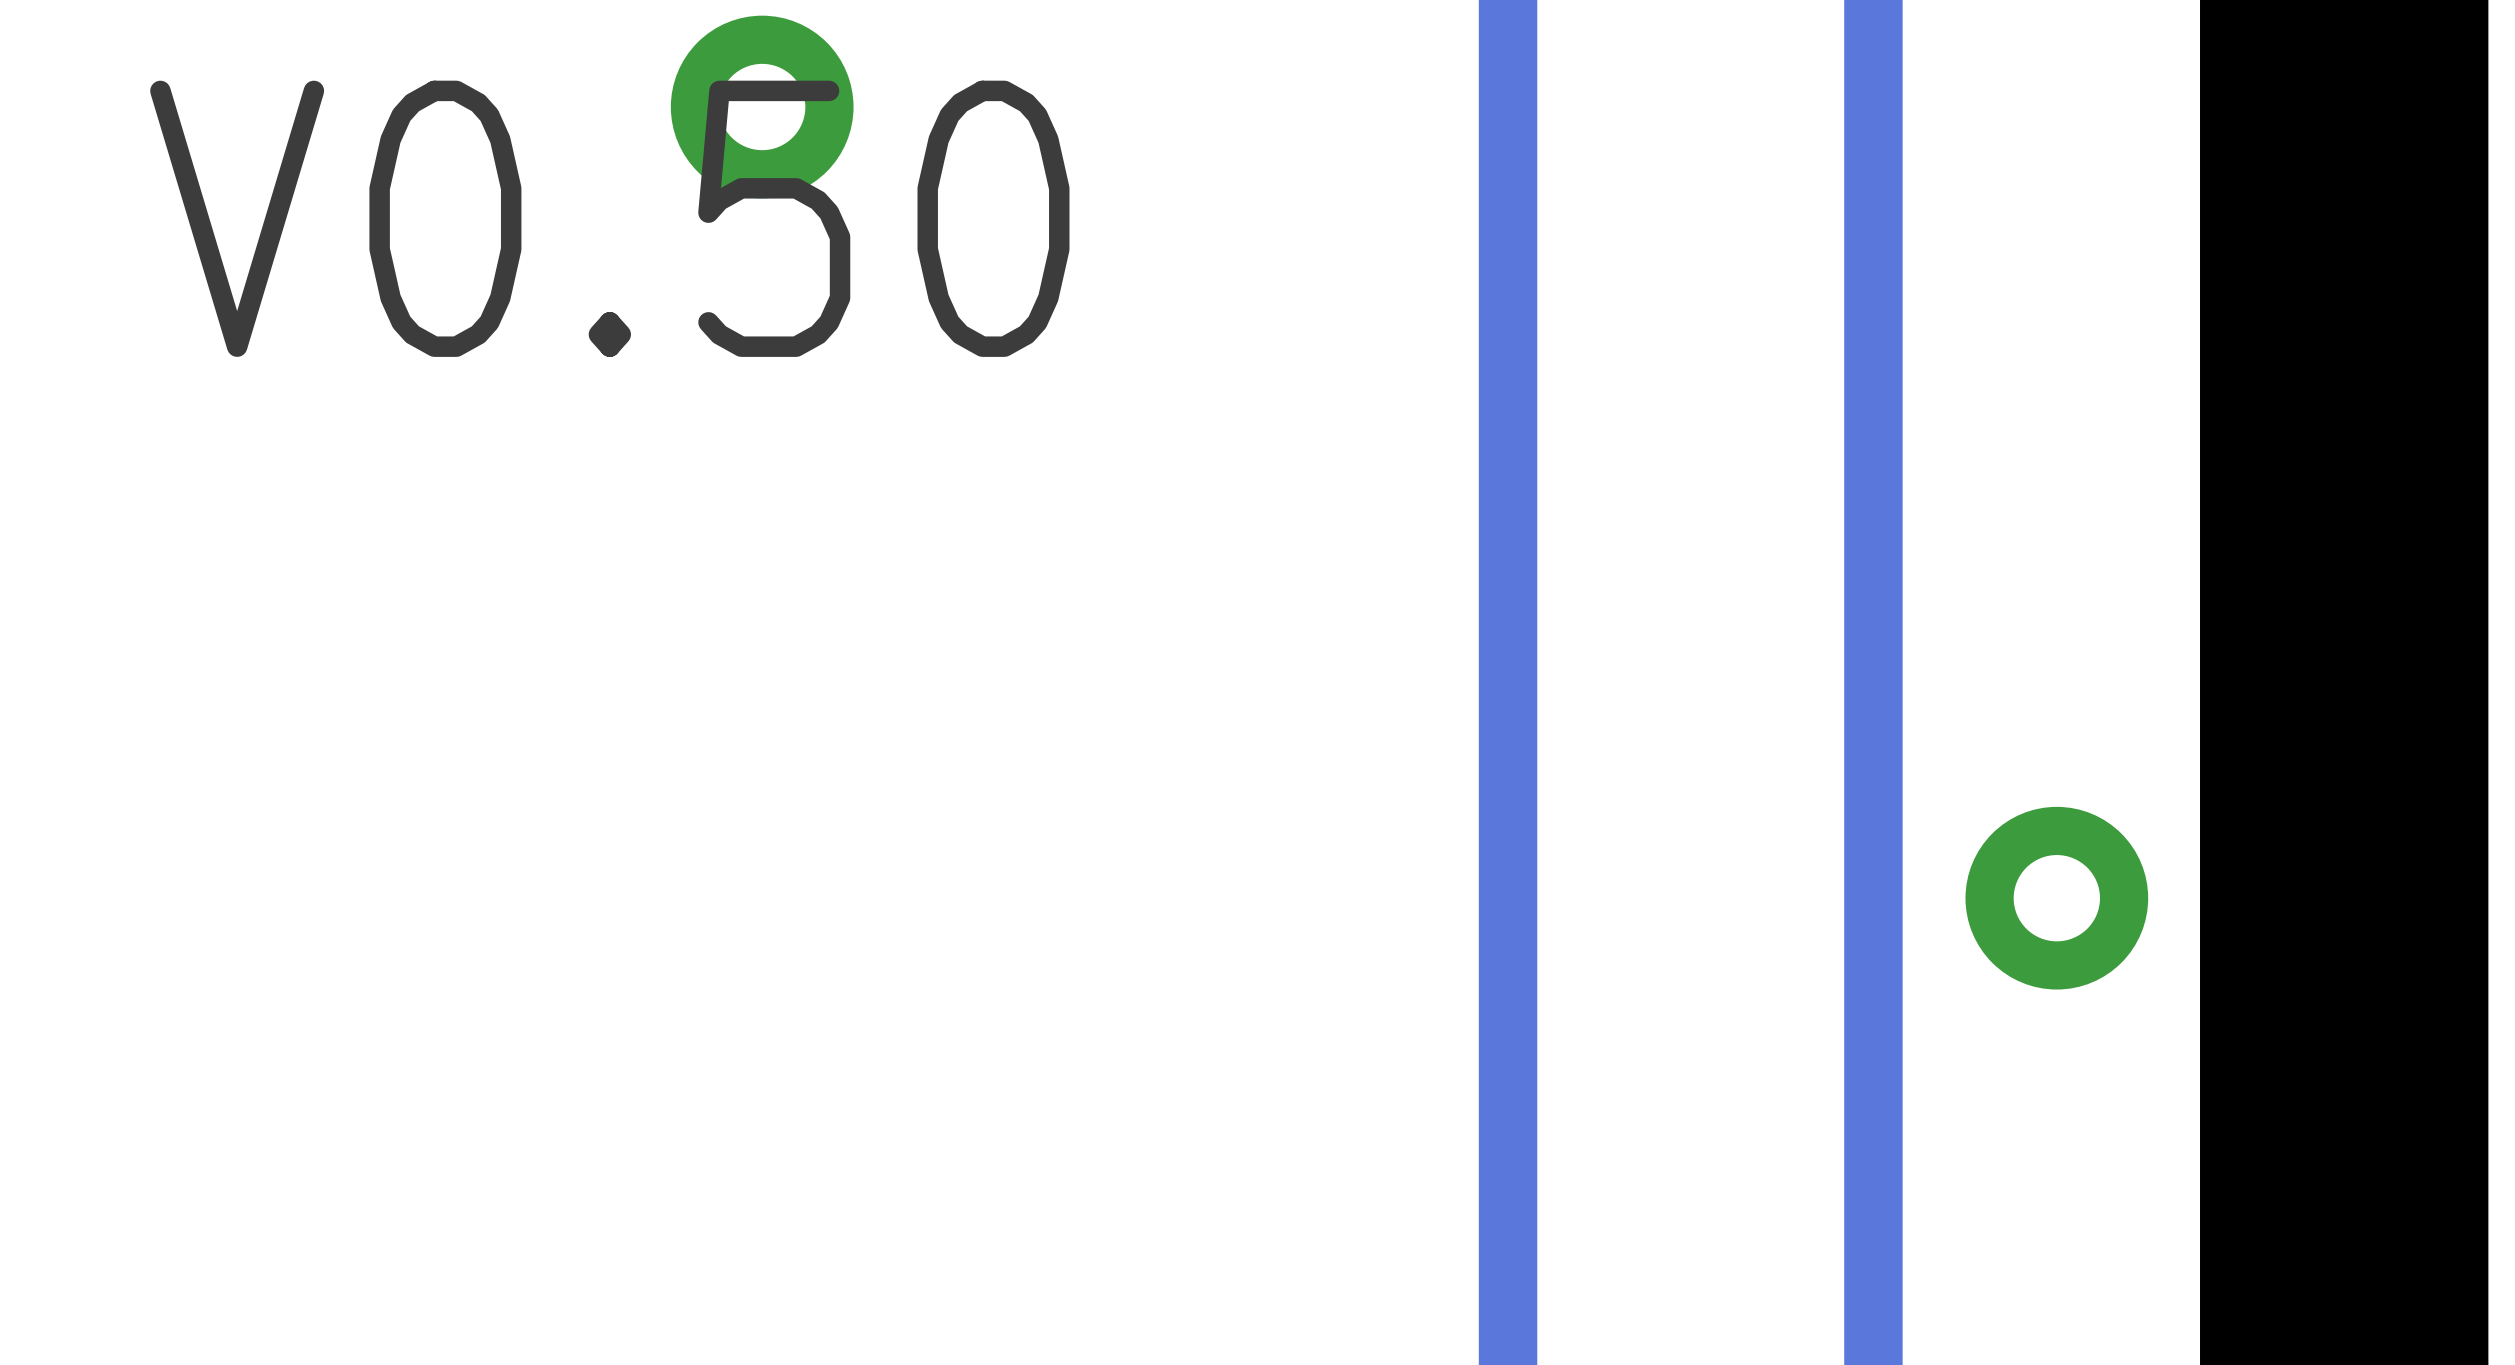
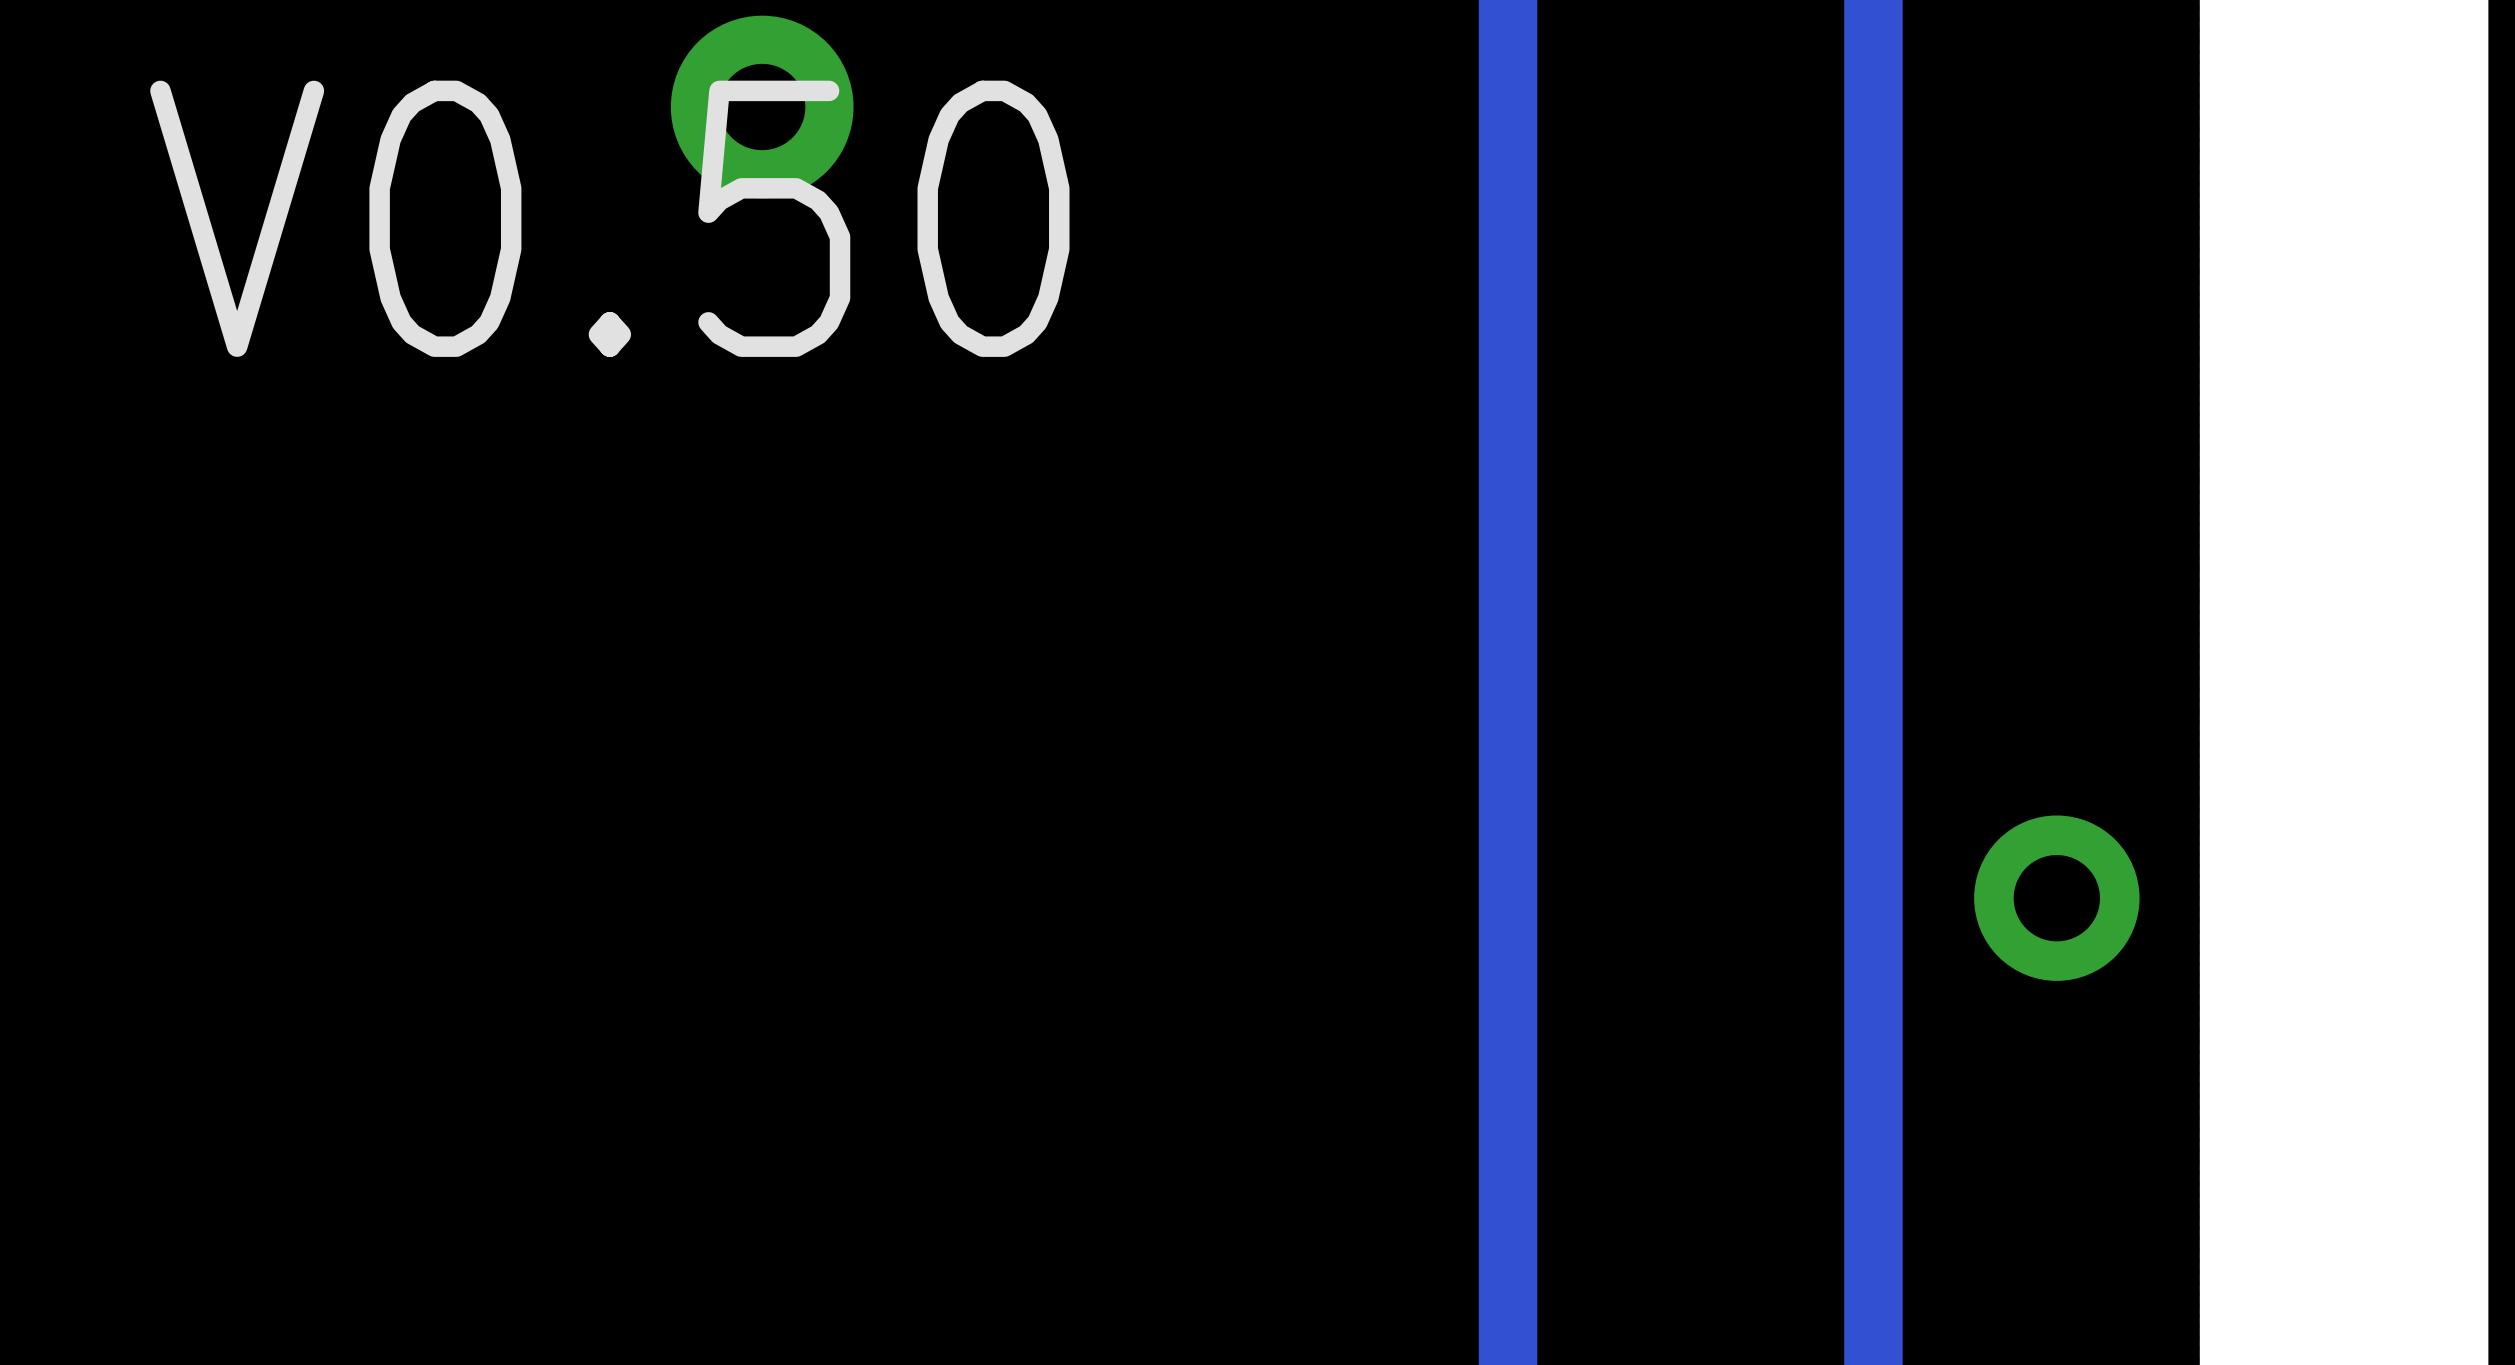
via size: [1965, 806, 2149, 990] -> [1974, 815, 2140, 981]

